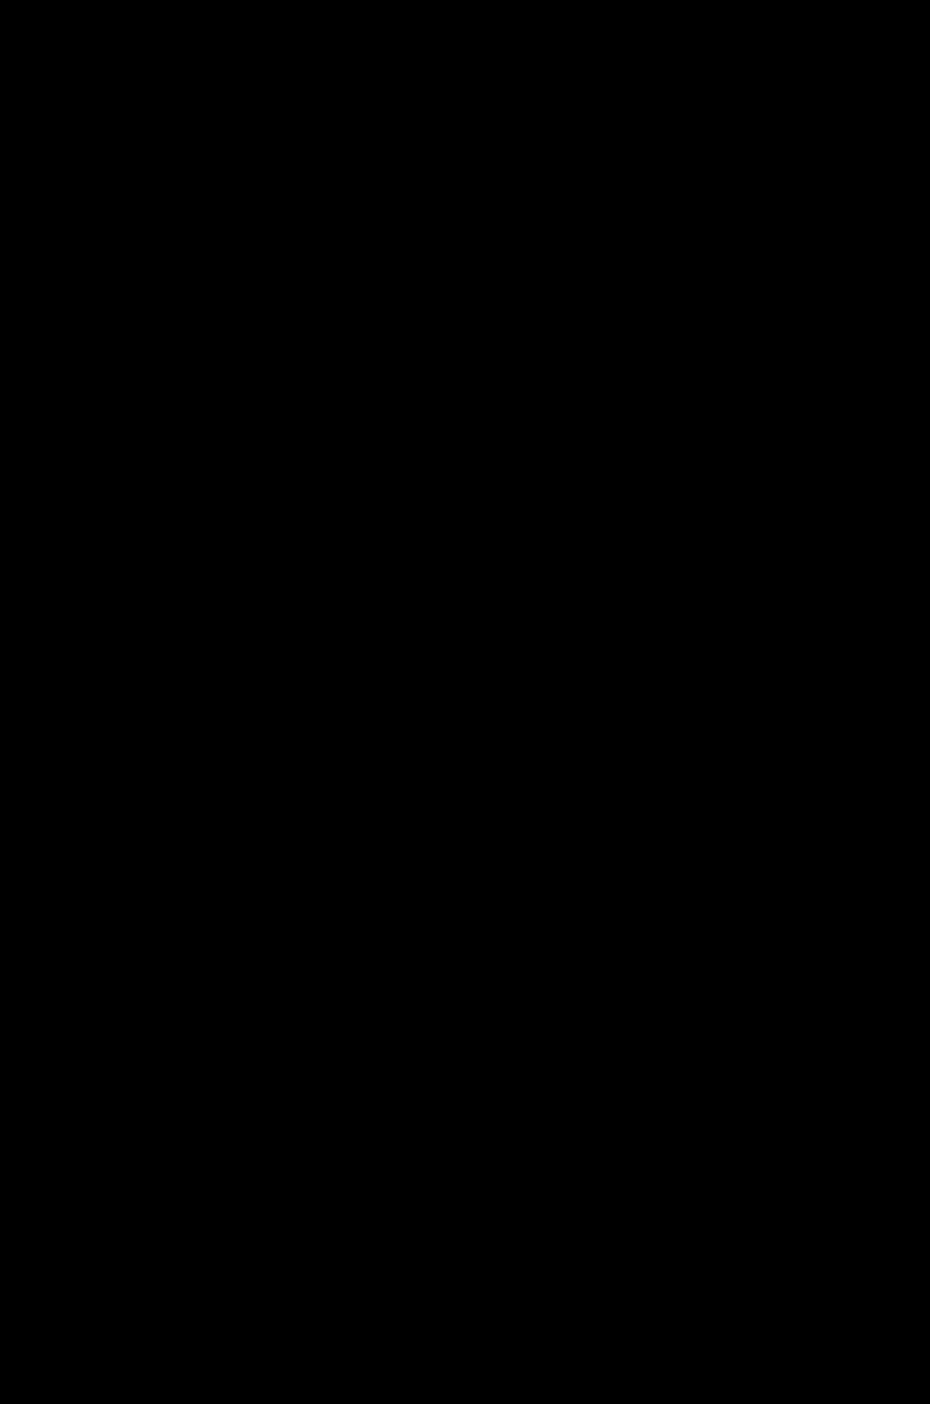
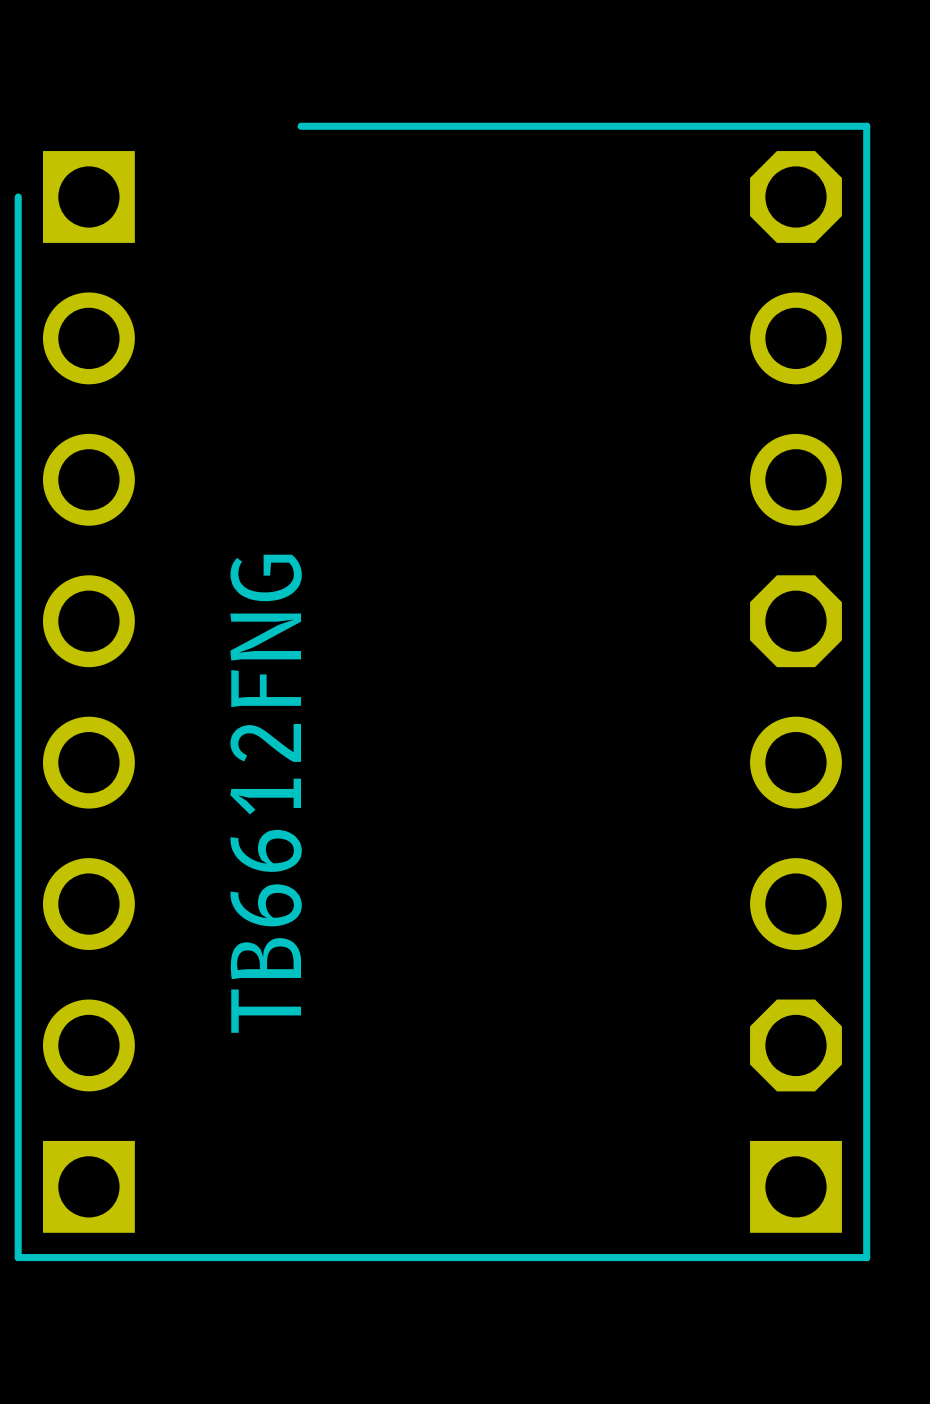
part: none -> (442, 691)

